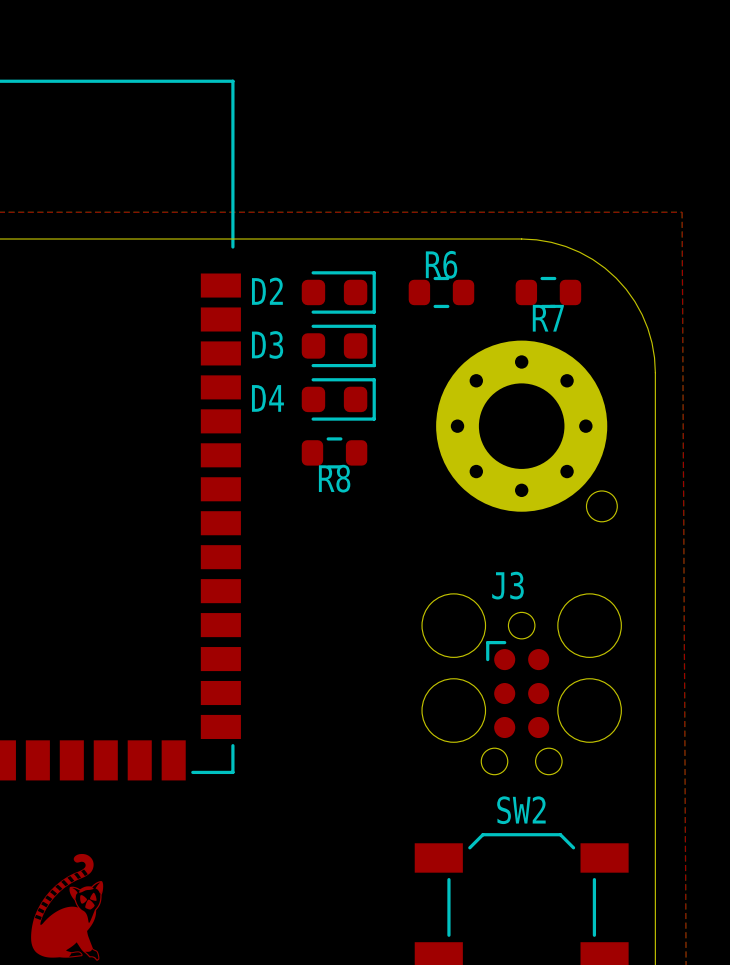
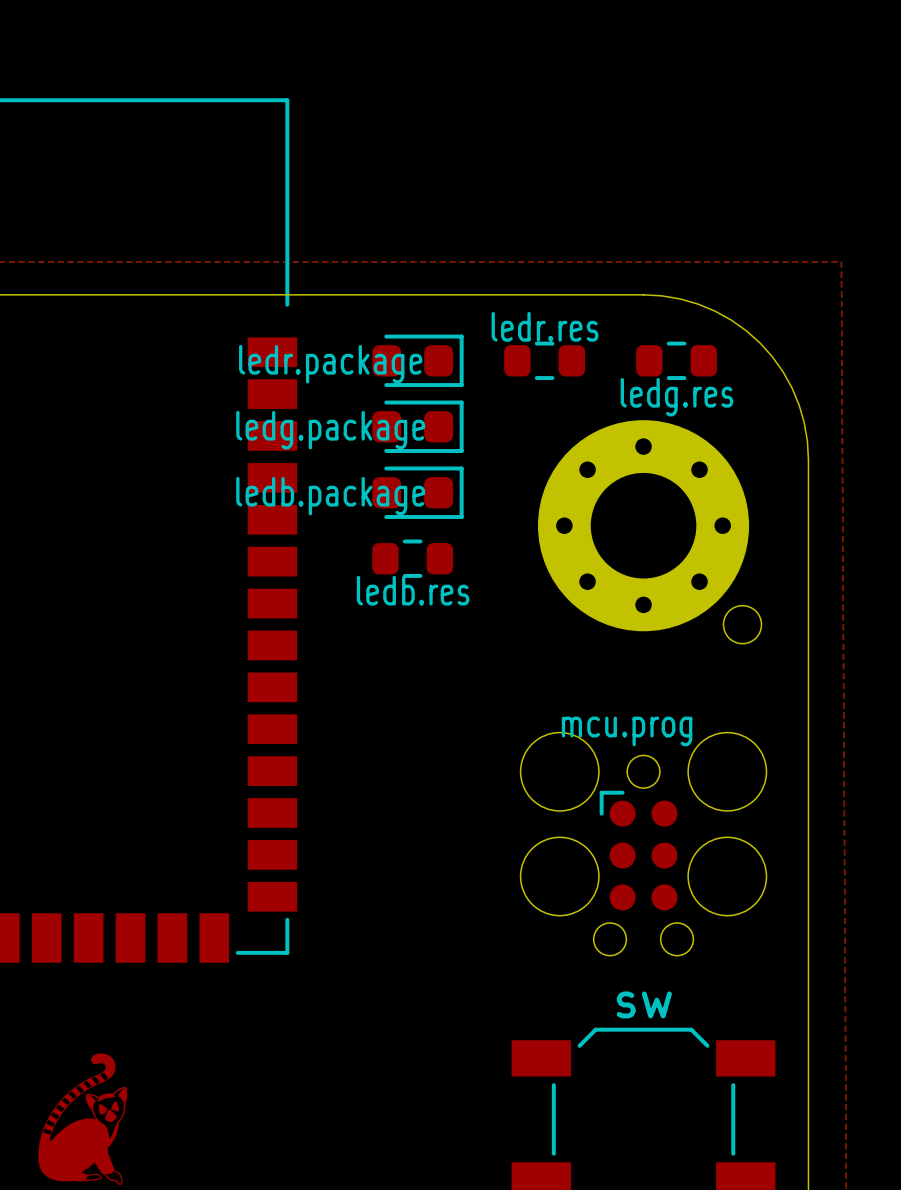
R6 name: R6 (441, 264) -> ledr.res (545, 326)
D2 name: D2 (267, 291) -> ledr.package (330, 364)
R7 name: R7 (548, 318) -> ledg.res (677, 397)
D3 name: D3 (267, 344) -> ledg.package (330, 430)
D4 name: D4 (267, 398) -> ledb.package (330, 496)
R8 name: R8 (334, 478) -> ledb.res (413, 590)
J3 name: J3 (507, 585) -> mcu.prog (627, 731)
SW2 name: SW2 (521, 810) -> sw (644, 1004)

